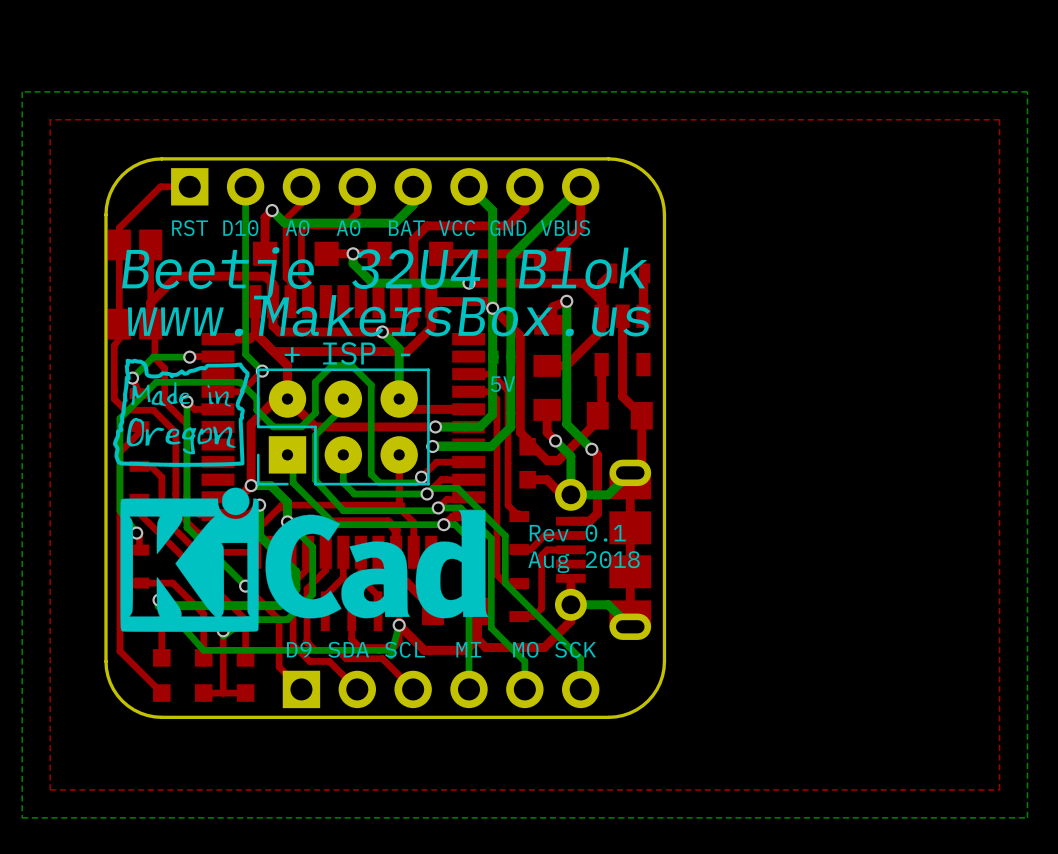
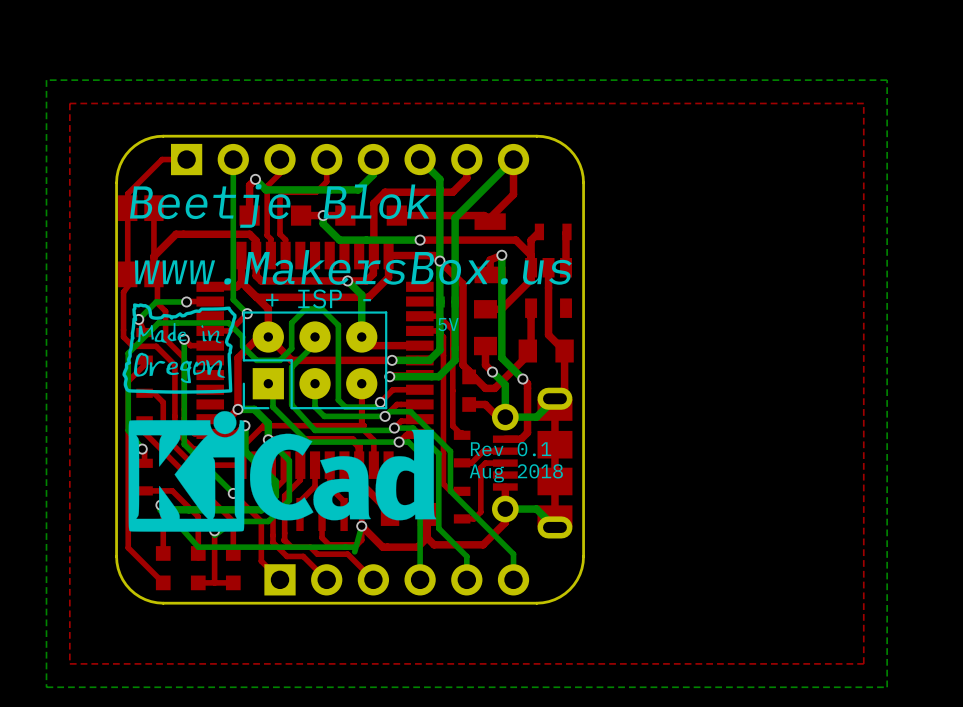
text: RST D10 A0 A0 BAT VCC GND VBUS (381, 228) -> none
text: Beetje 32U4 Blok (384, 273) -> Beetje Blok (280, 205)
text: D9 SDA SCL MI MO SCK (441, 649) -> none

